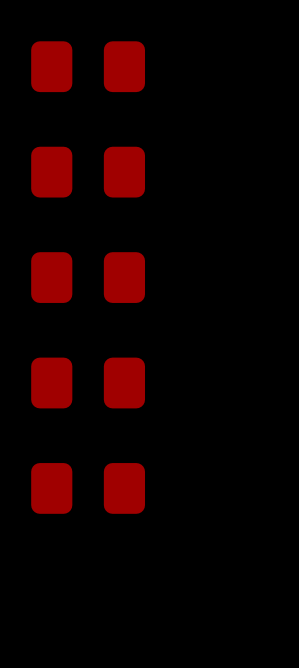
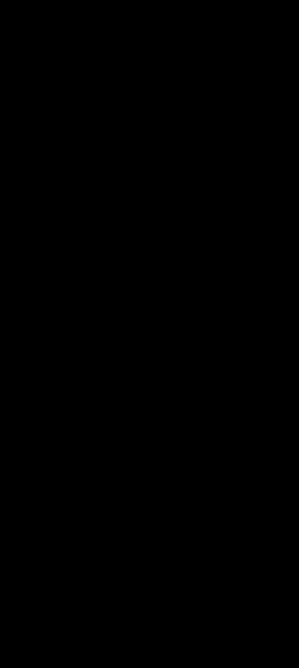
part: (88, 66) -> none
part: (88, 172) -> none
part: (88, 277) -> none
part: (88, 383) -> none
part: (88, 488) -> none

